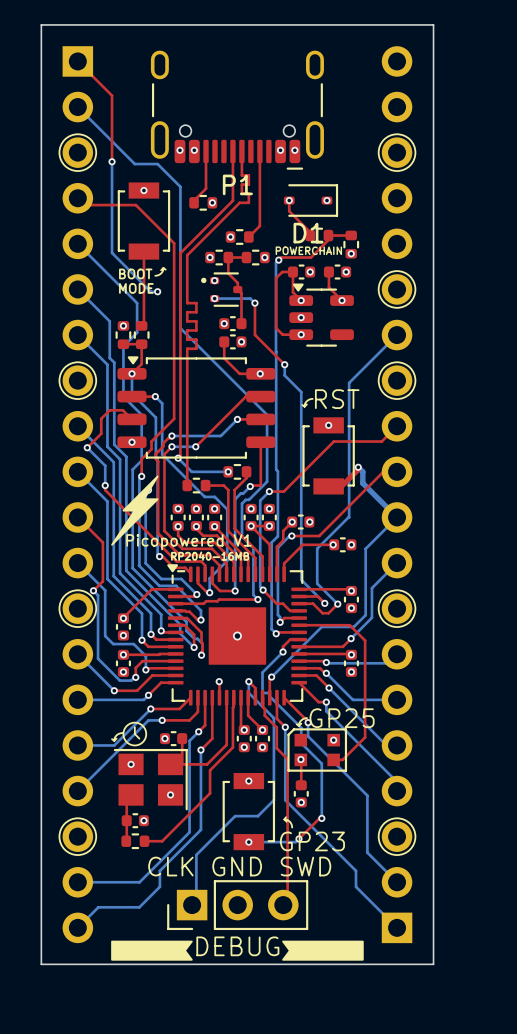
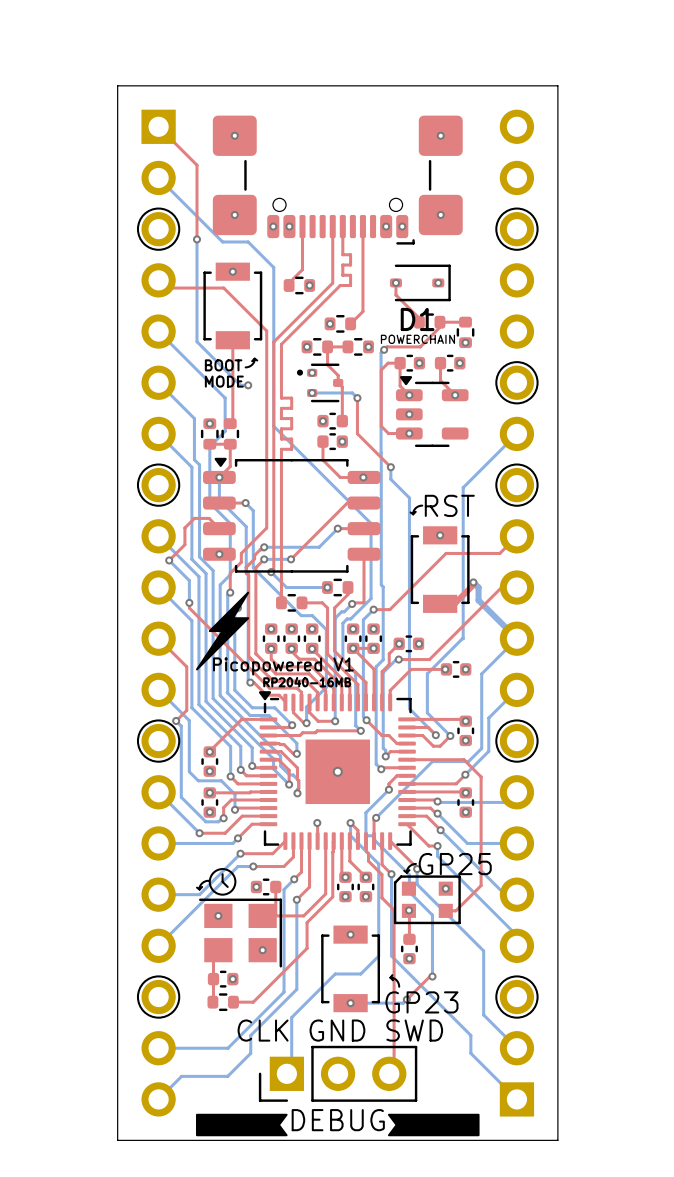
via: none -> (234, 135)
via: none -> (440, 135)
part: none -> (337, 180)
P1: (237, 110) -> none
via: none -> (234, 214)
via: none -> (440, 214)

